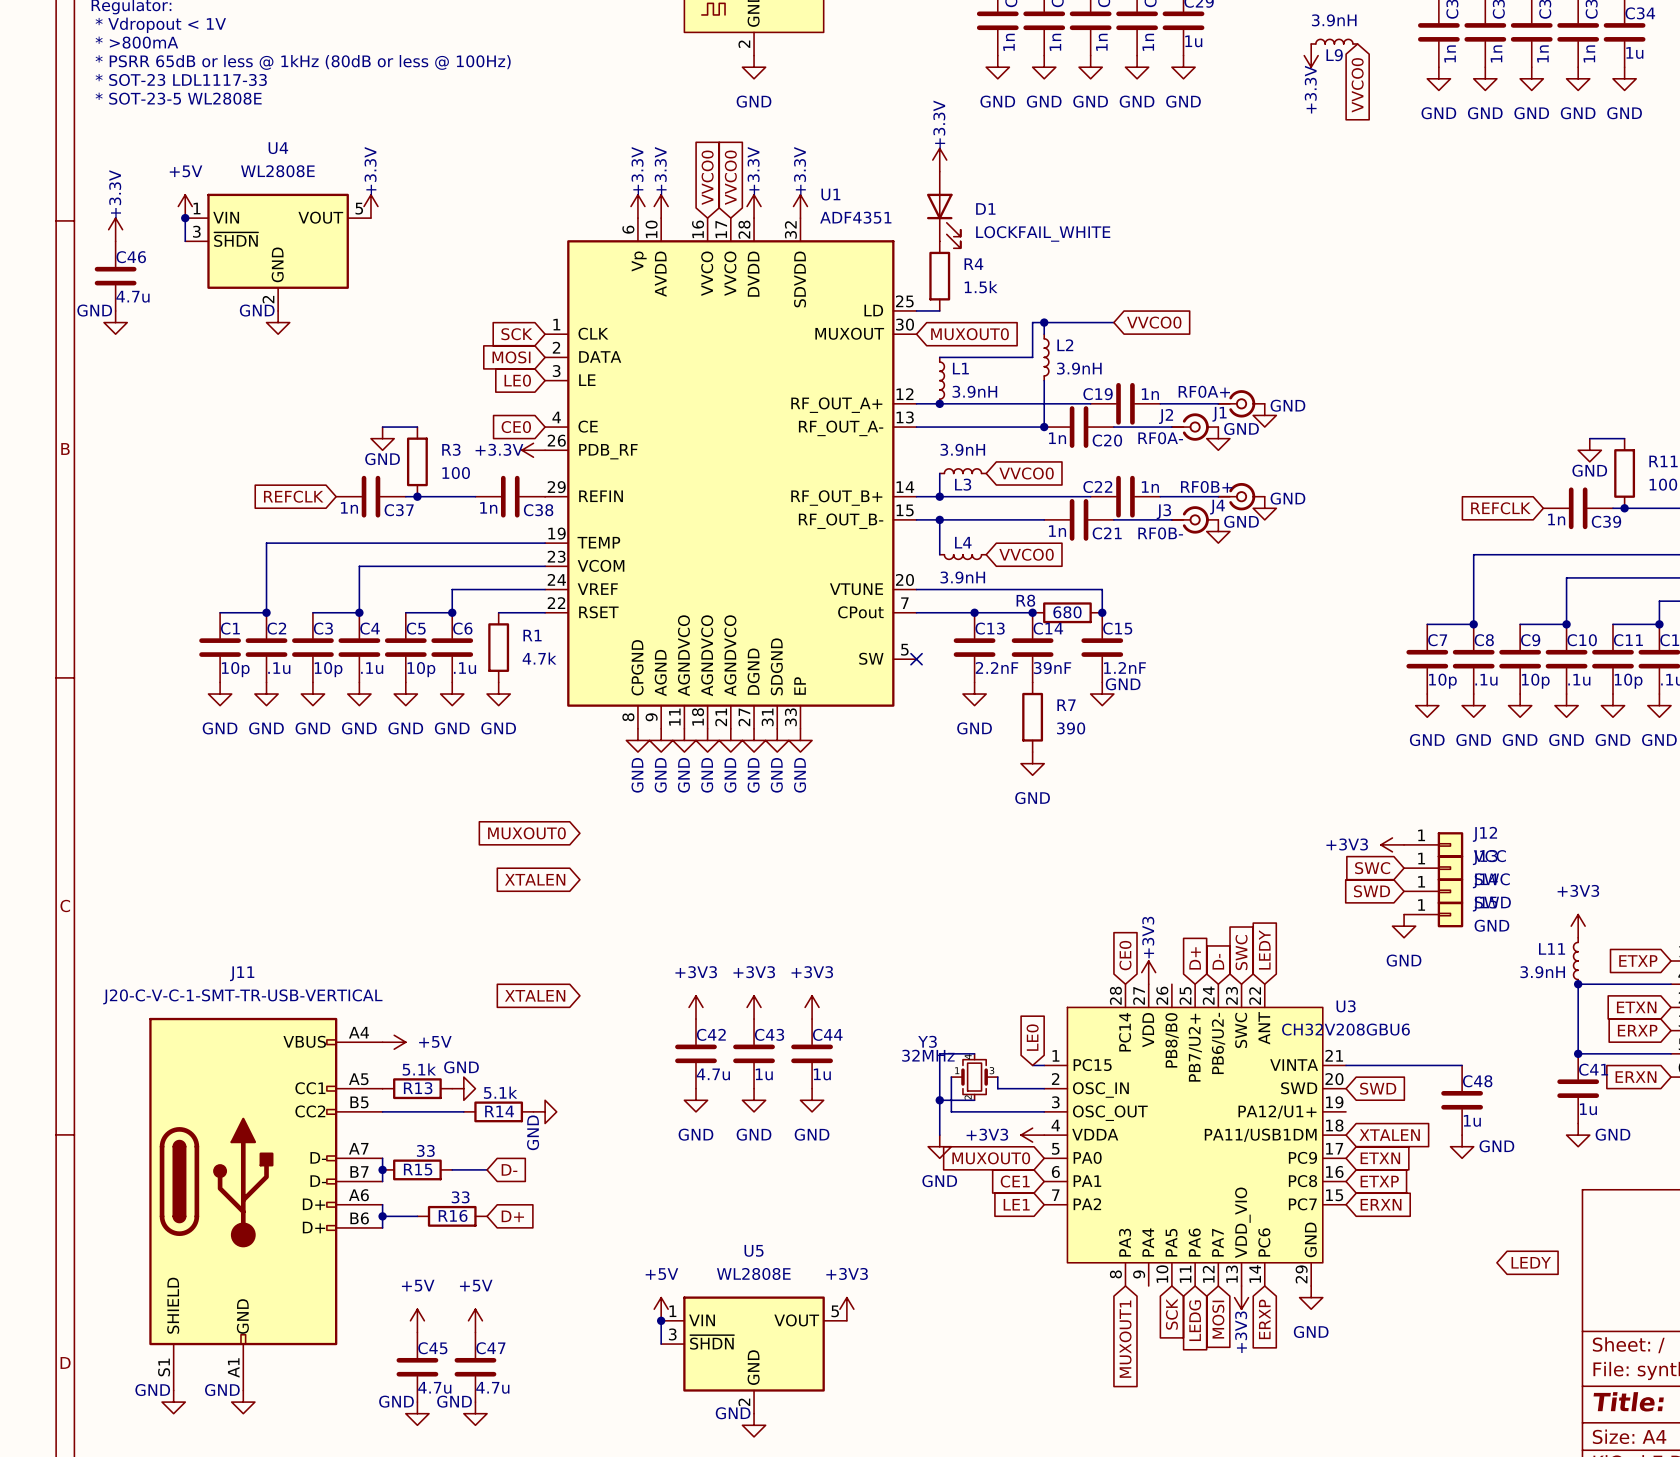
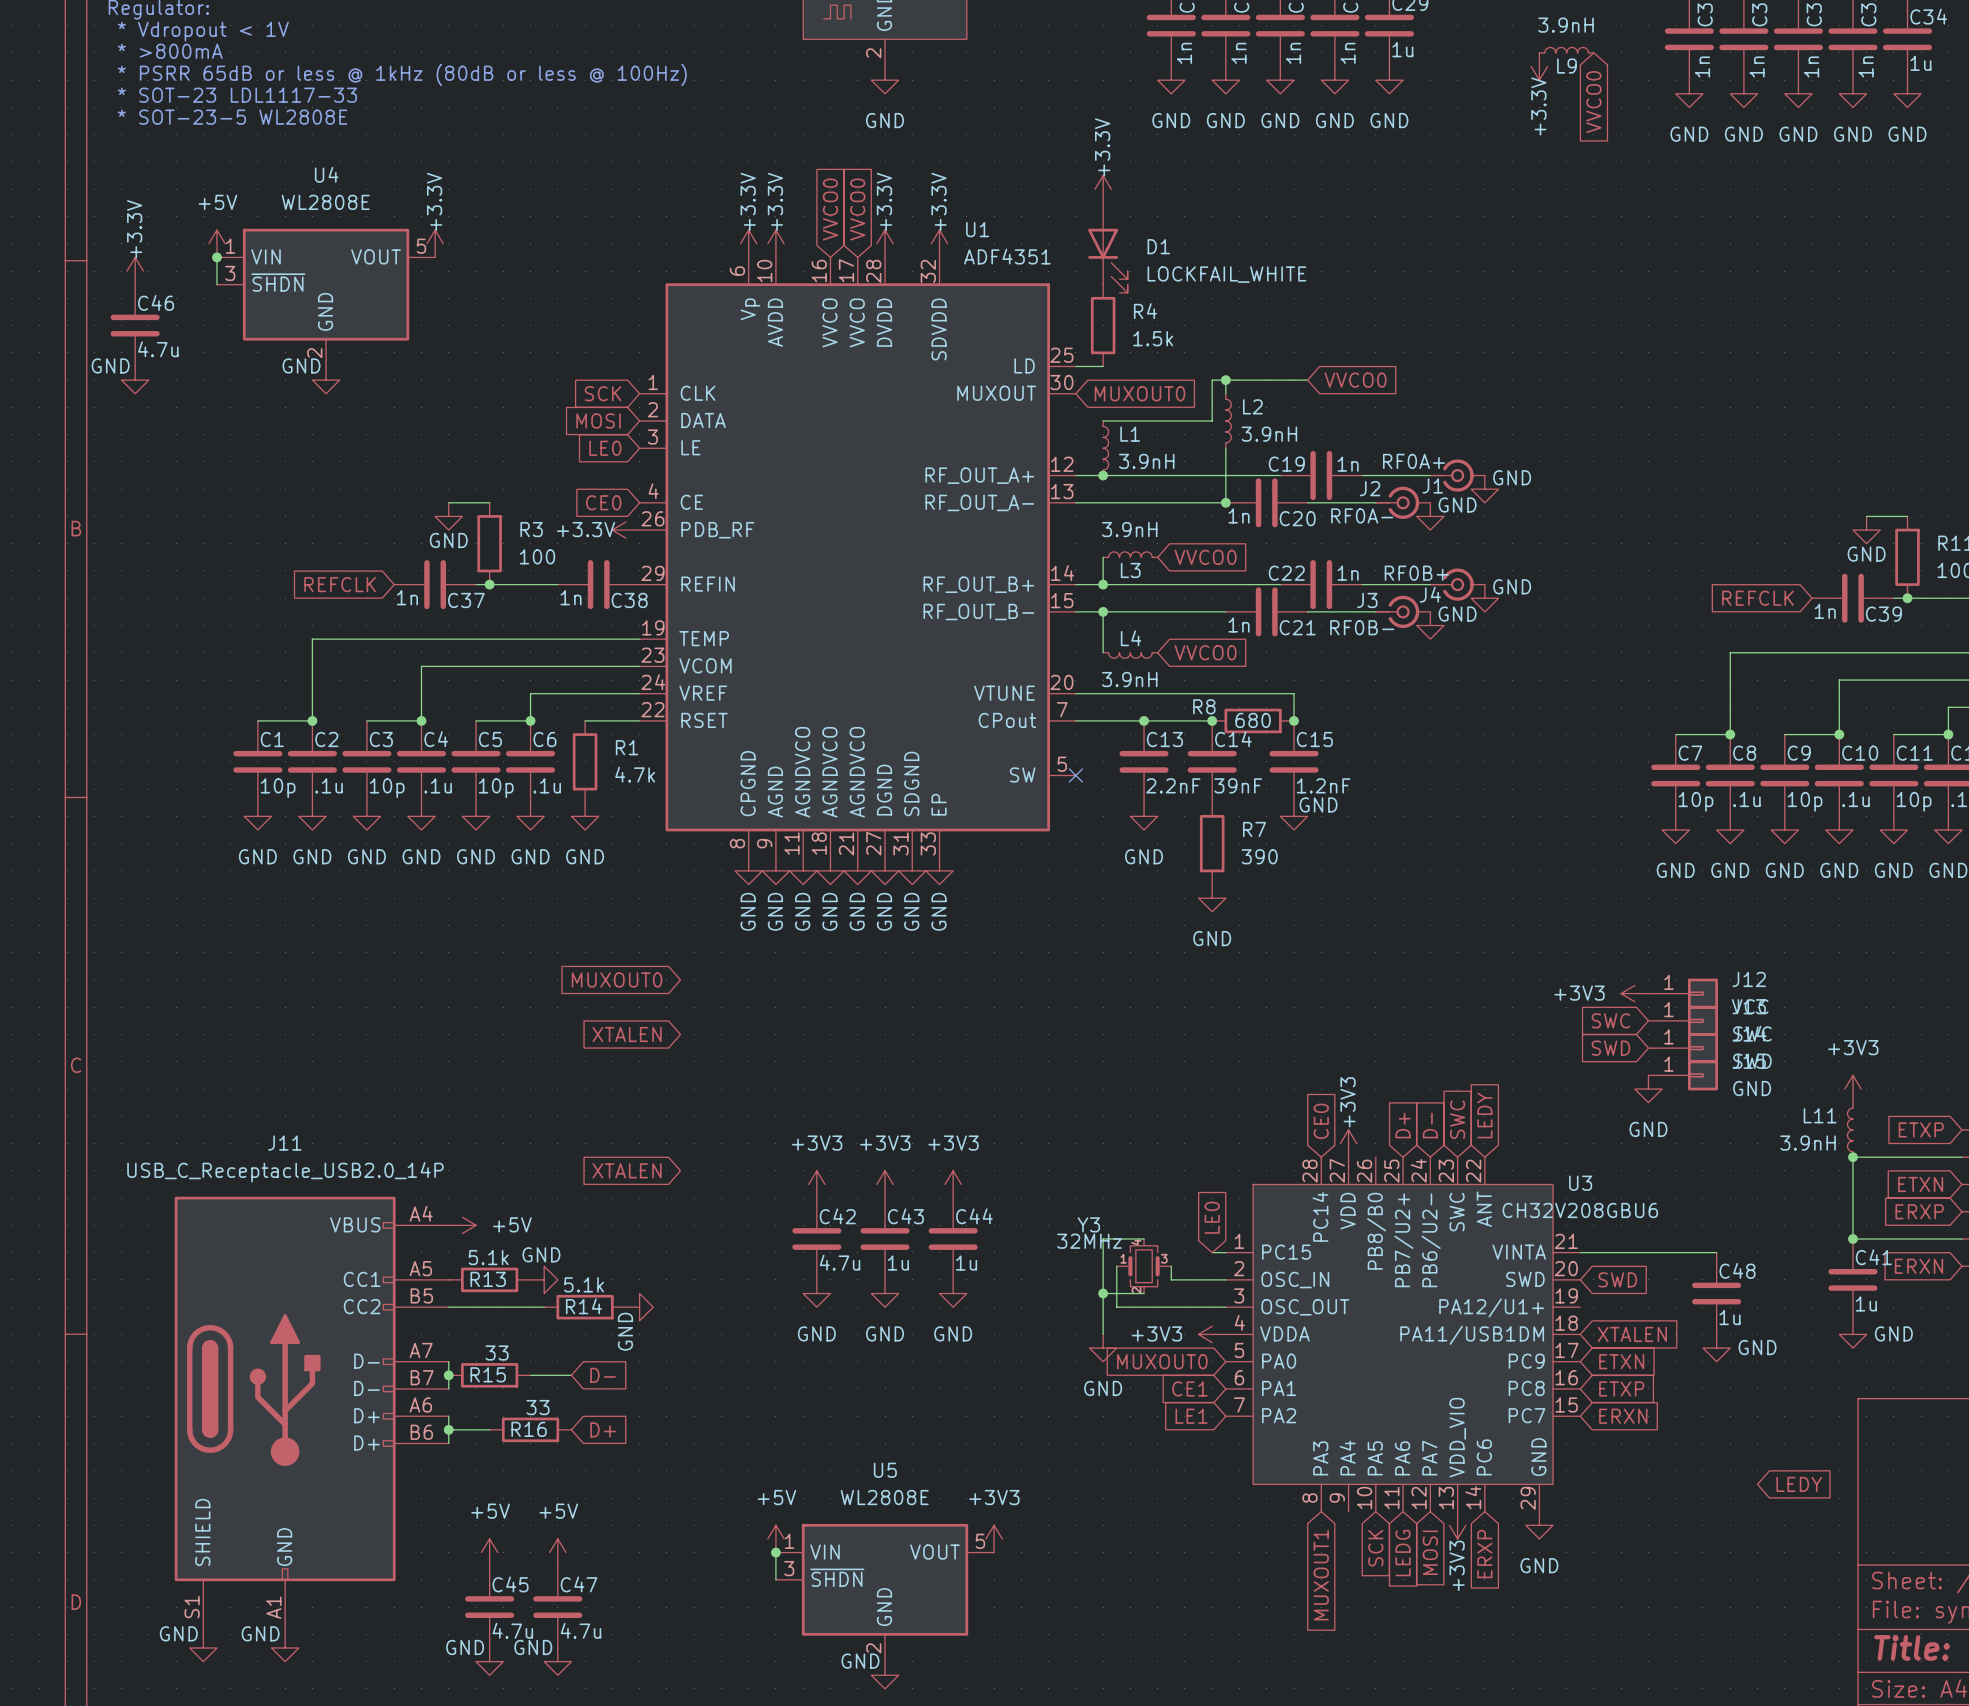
J11 value: J20-C-V-C-1-SMT-TR-USB-VERTICAL (242, 996) -> USB_C_Receptacle_USB2.0_14P (285, 1172)

